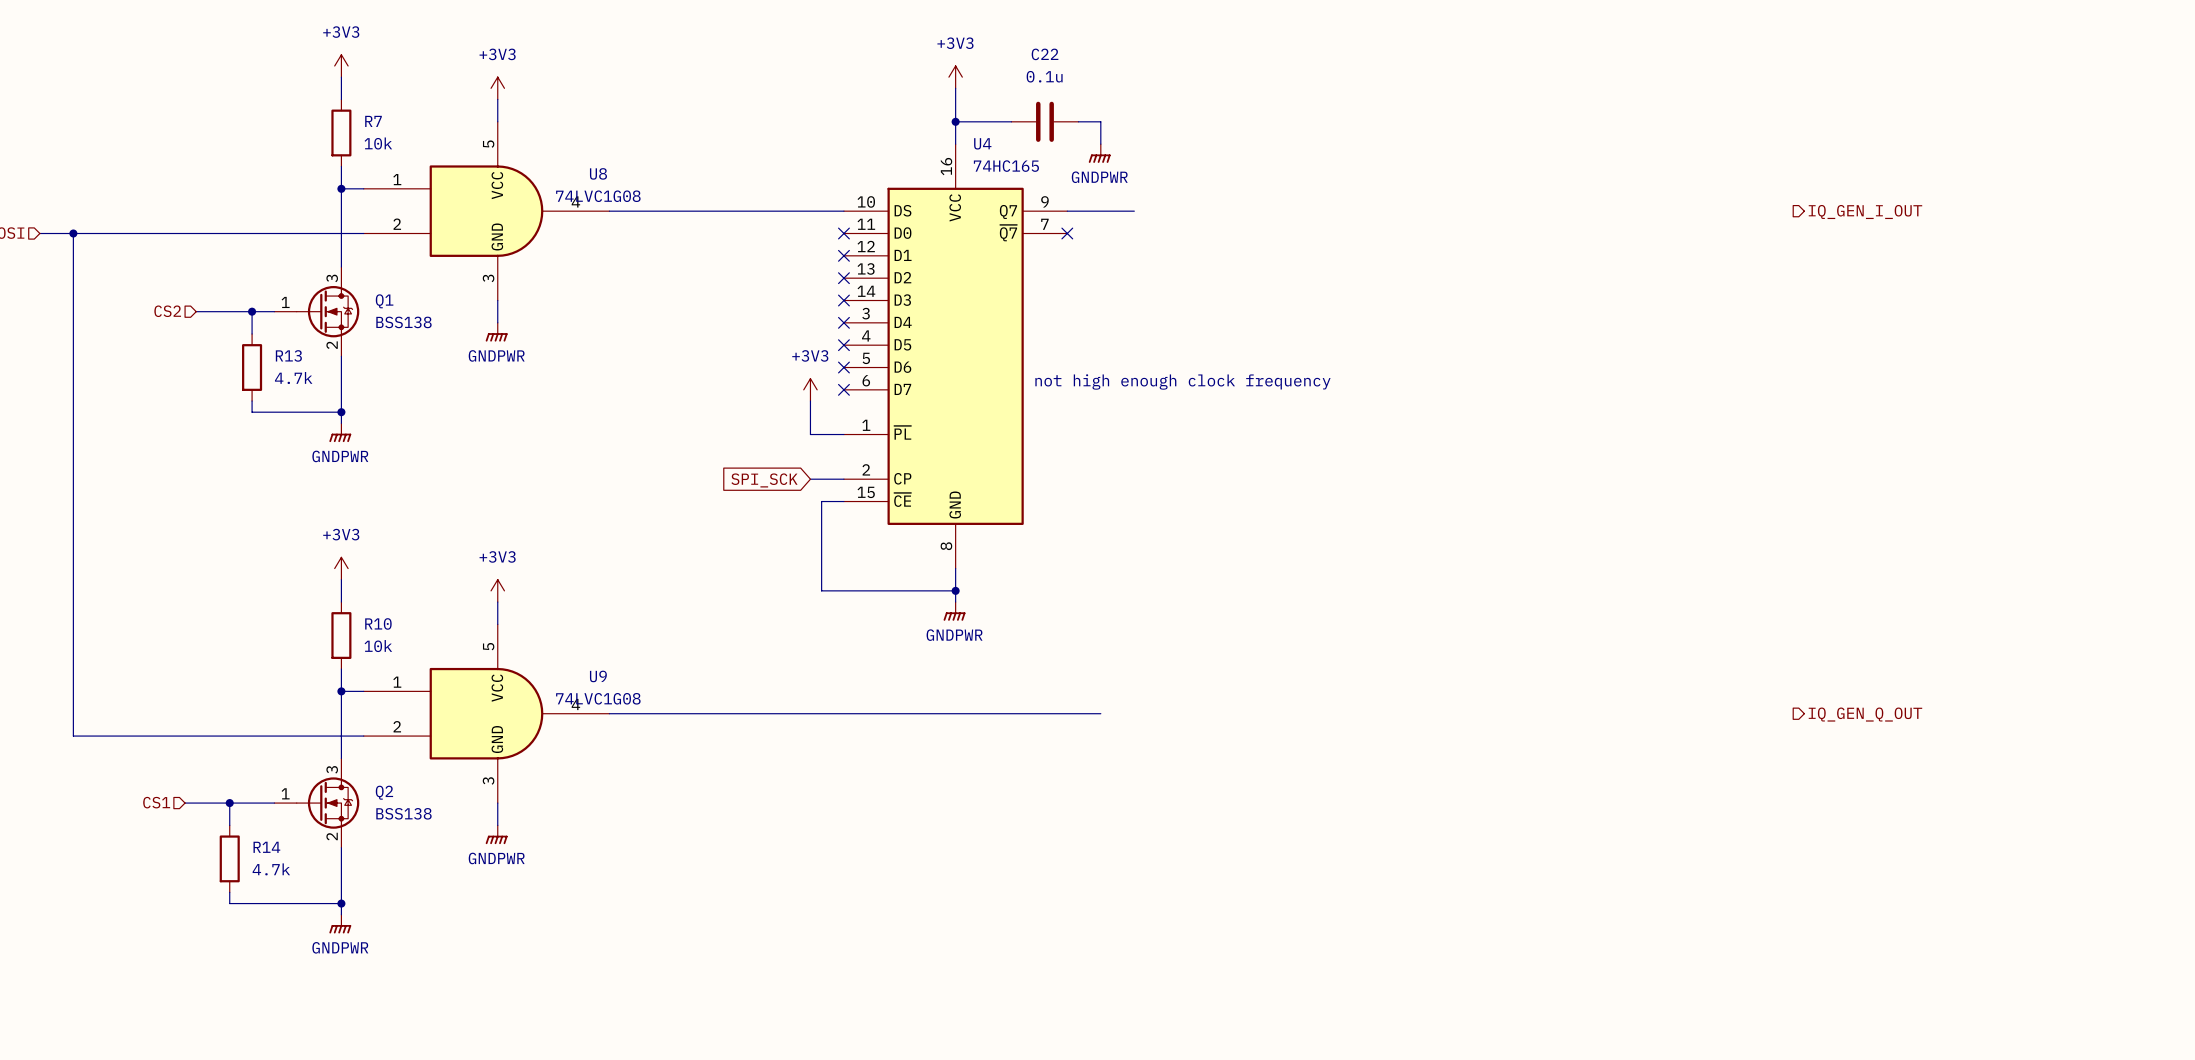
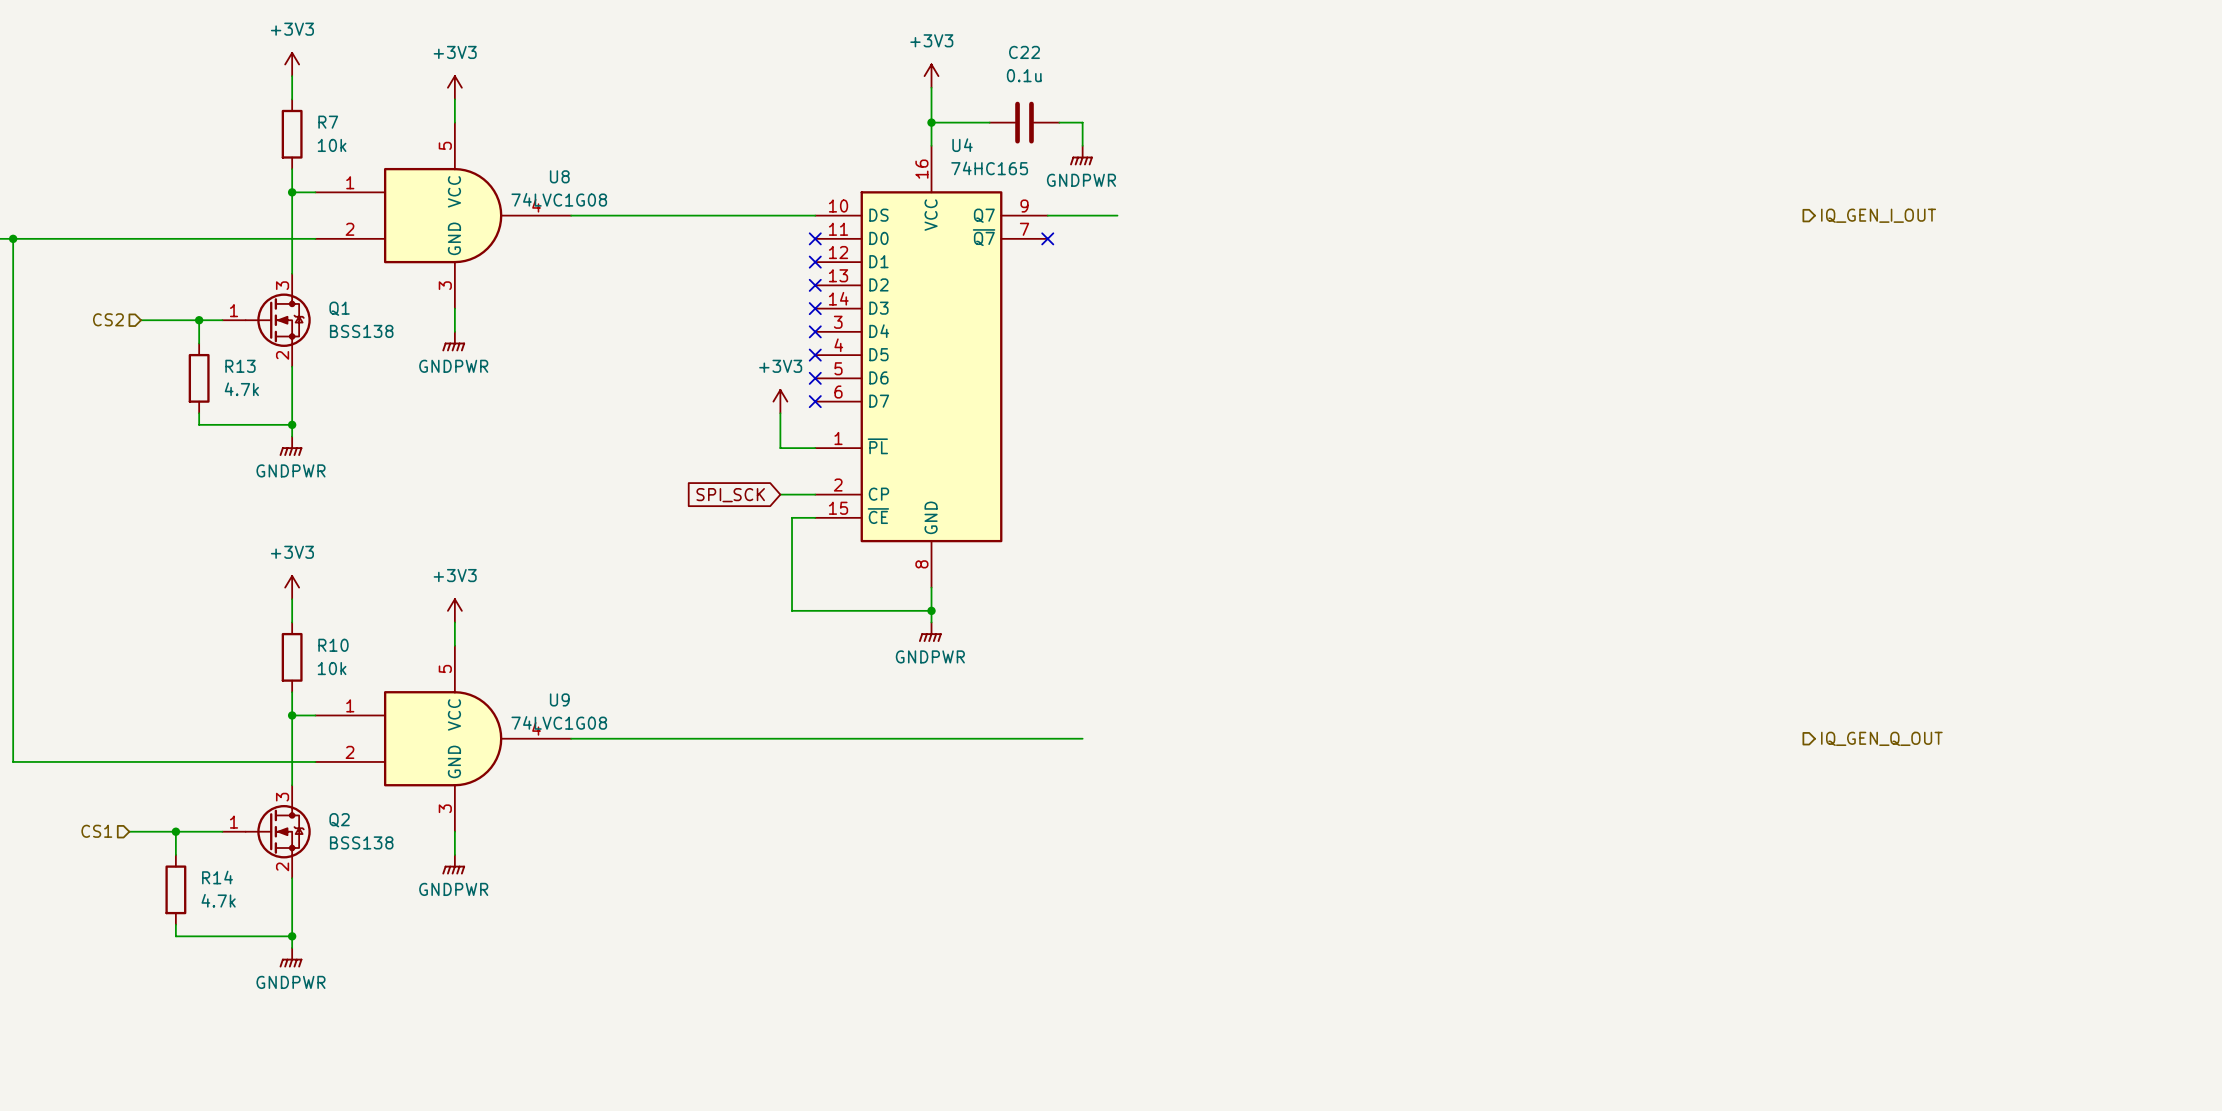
text: not high enough clock frequency (1182, 382) -> none

